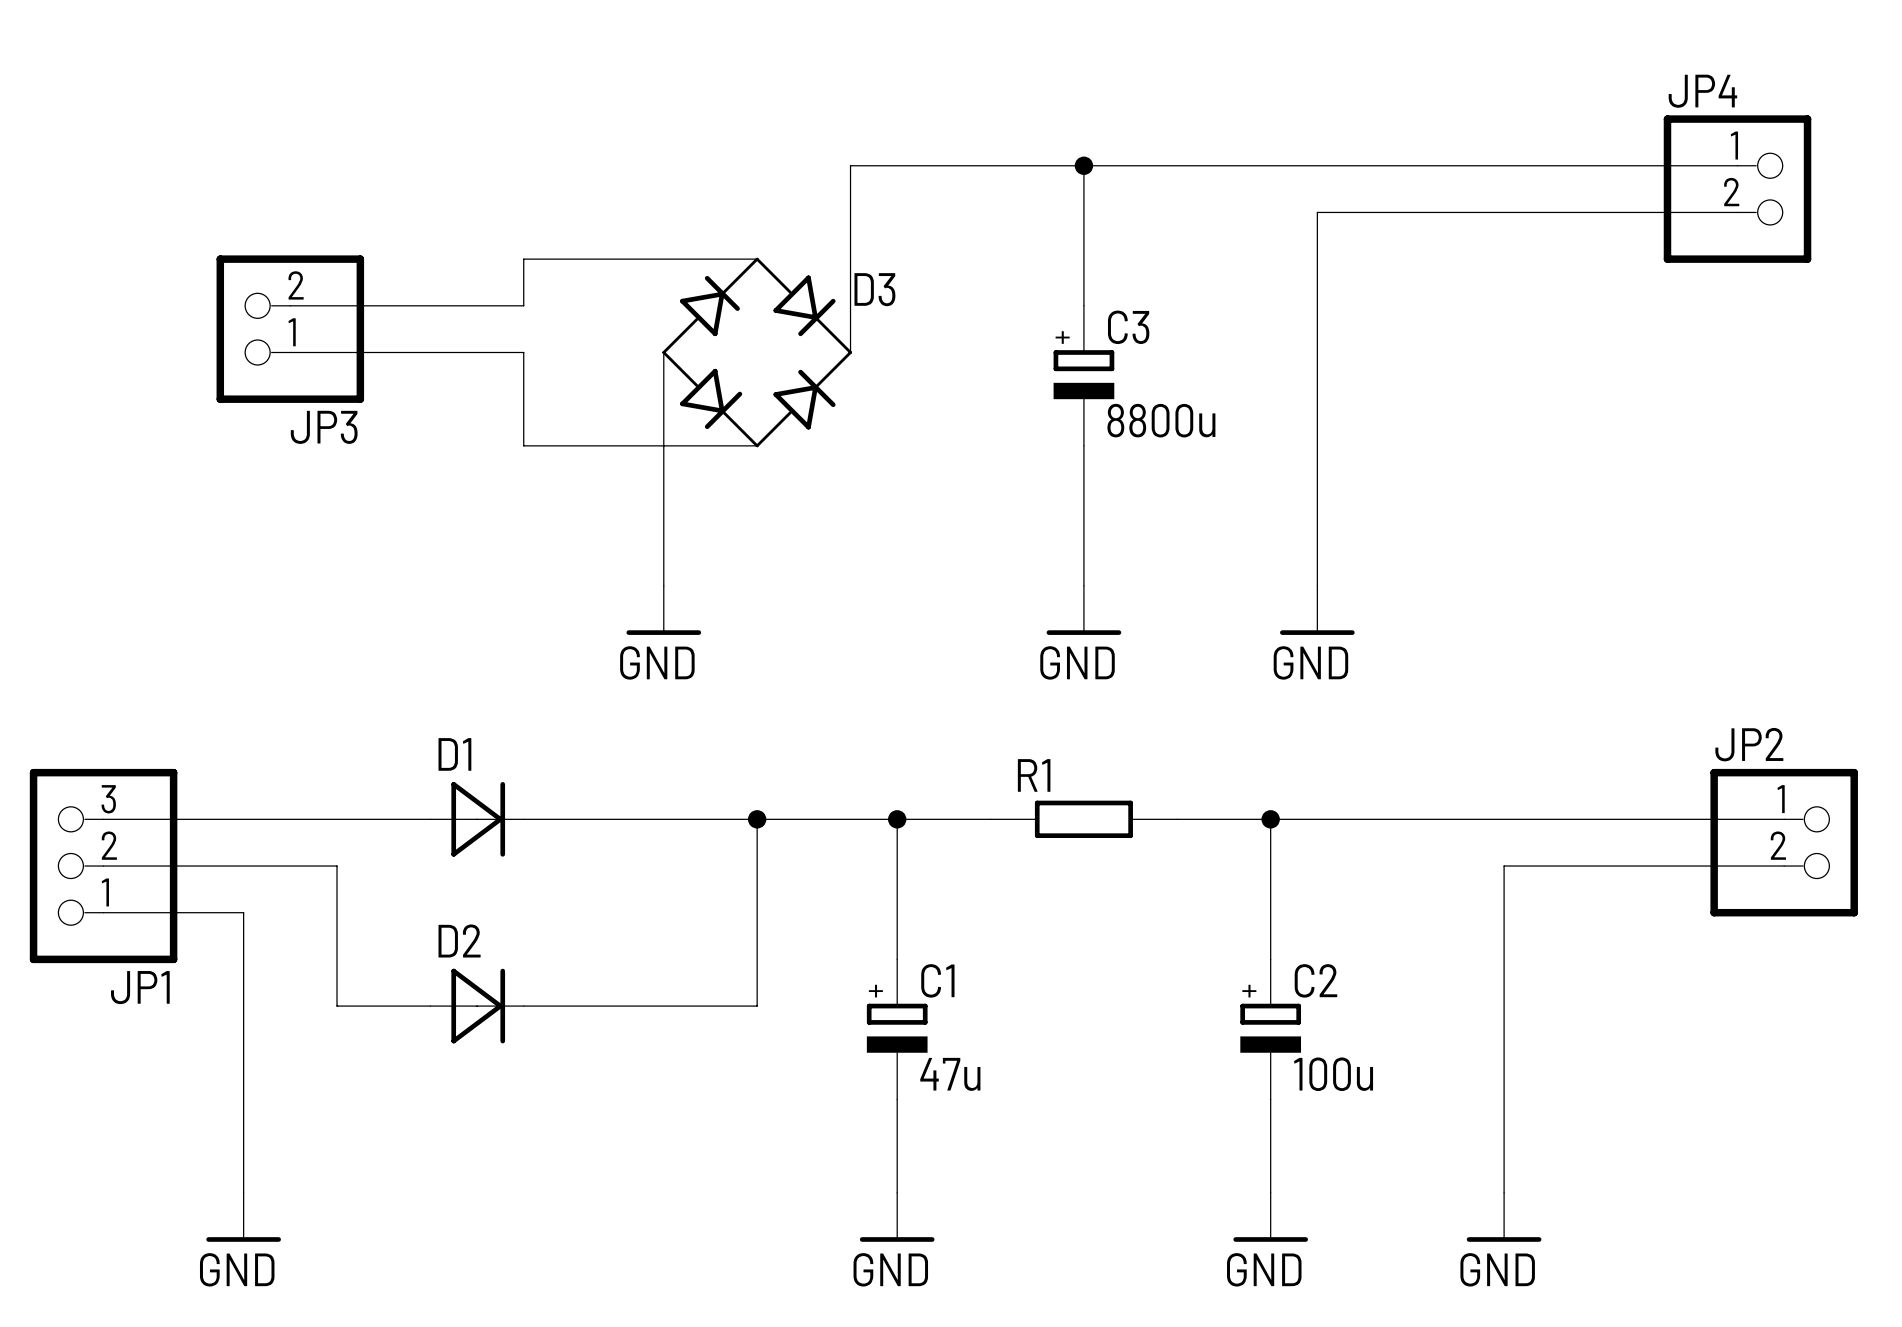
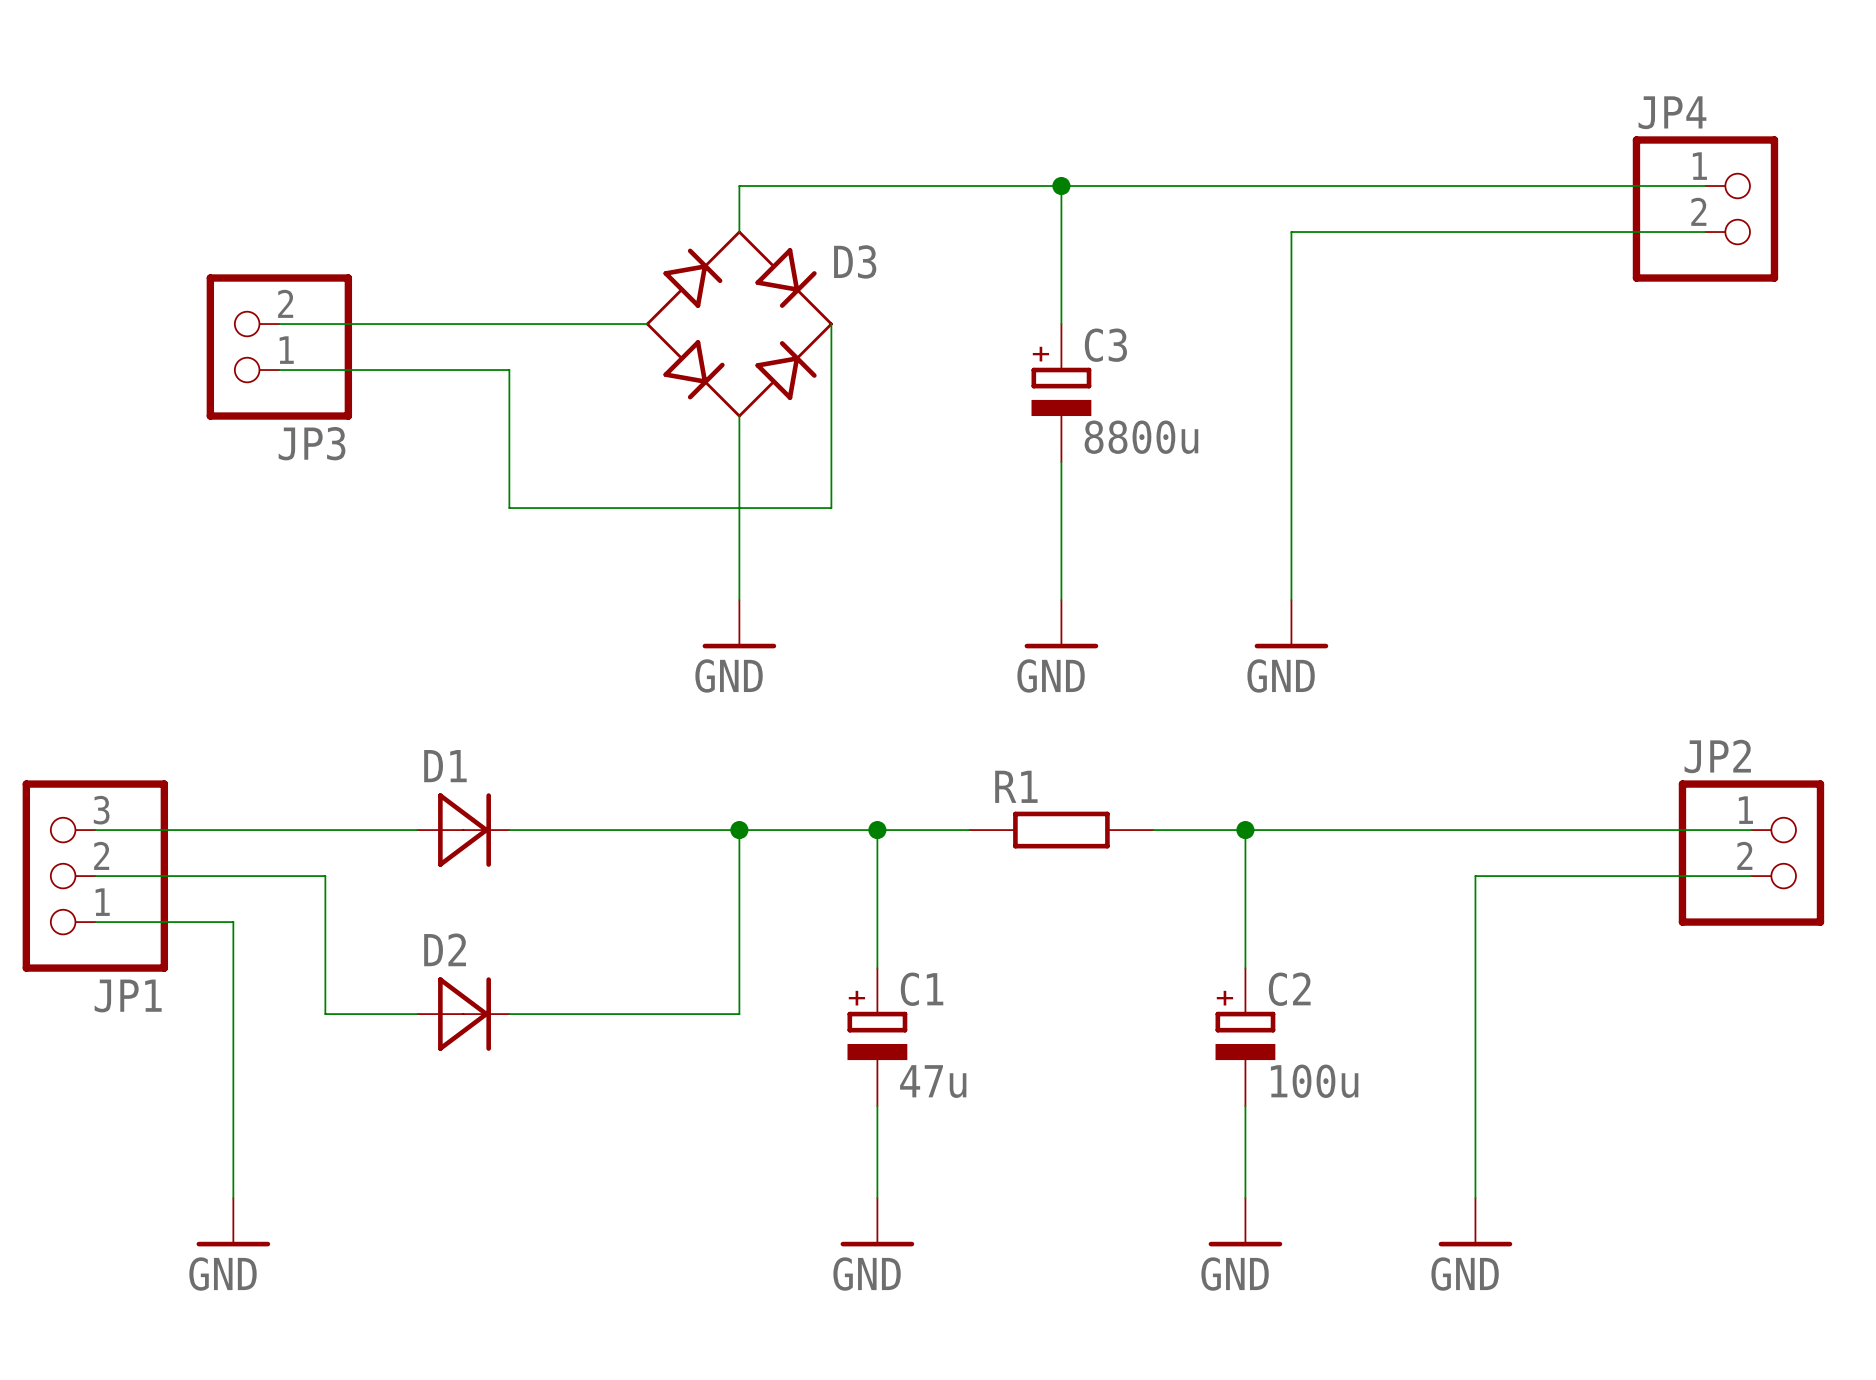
wire: (850, 165) (850, 305) -> (831, 186) (739, 186) (739, 232)
wire: (757, 259) (523, 259) (523, 305) -> (647, 324) (509, 324)
wire: (663, 352) (663, 585) -> none
D3 position: (757, 352) -> (739, 324)
wire: none -> (739, 416) (739, 600)
wire: (523, 445) (757, 445) -> (509, 462) (509, 508) (831, 508) (831, 370)
power symbol position: GND (663, 610) -> GND (739, 624)

